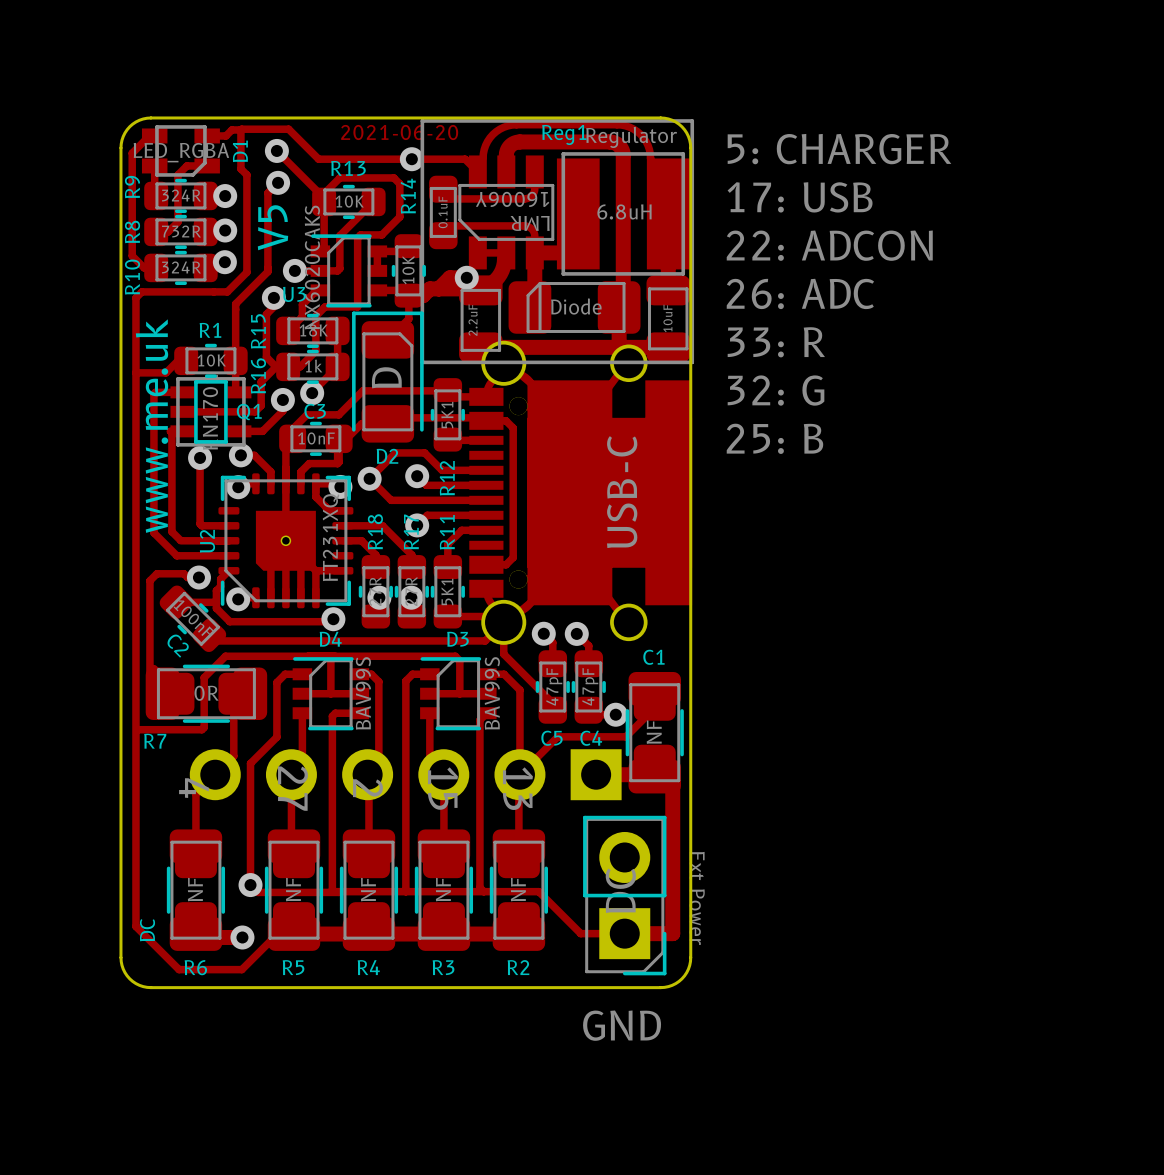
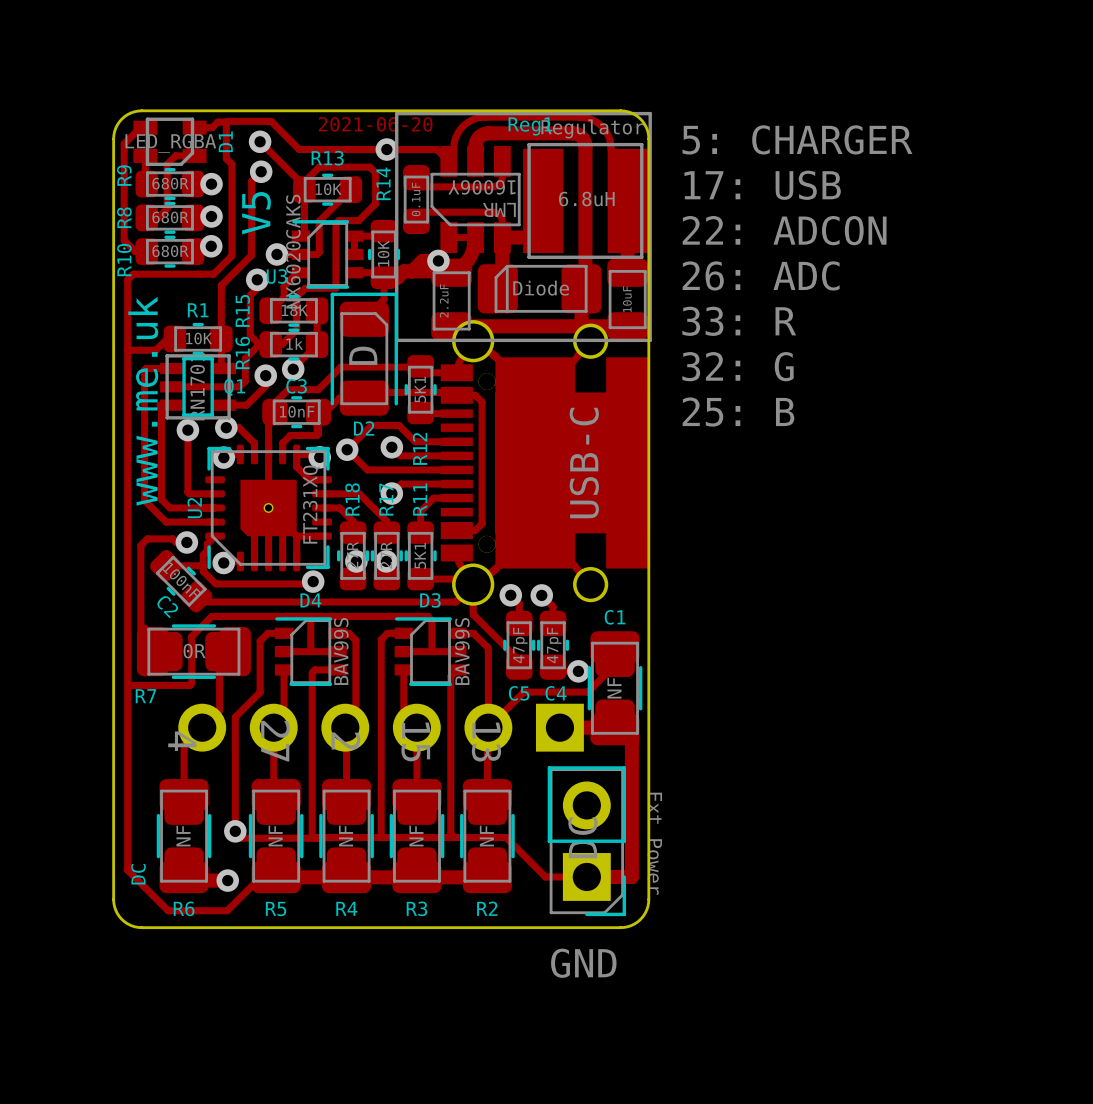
R9 value: 324R (181, 195) -> 680R (170, 183)
R8 value: 732R (181, 231) -> 680R (170, 217)
R10 value: 324R (181, 267) -> 680R (170, 251)

